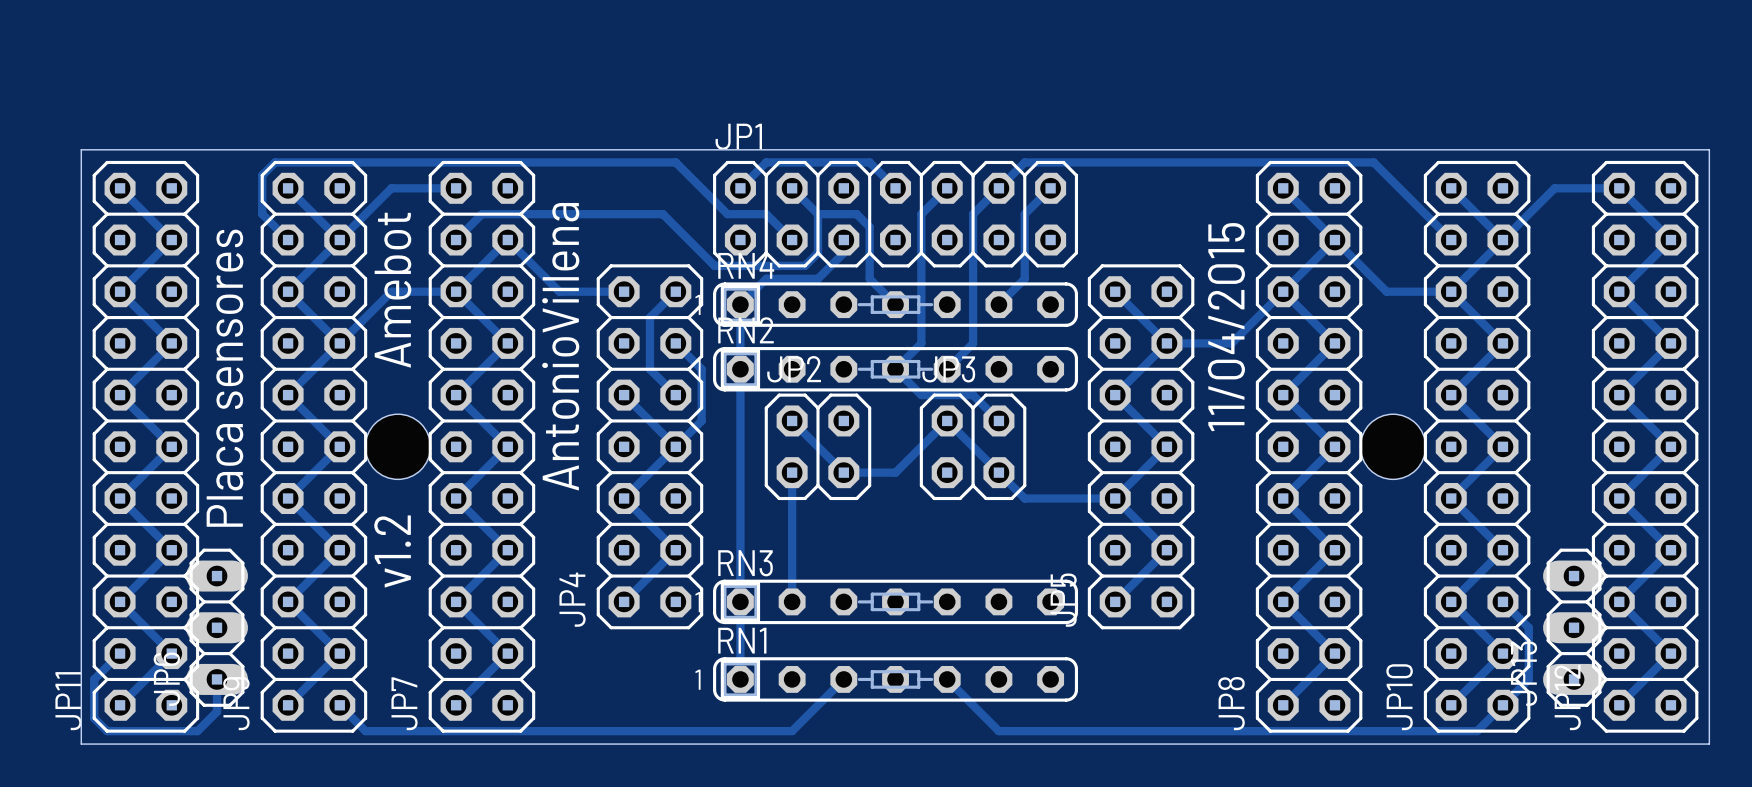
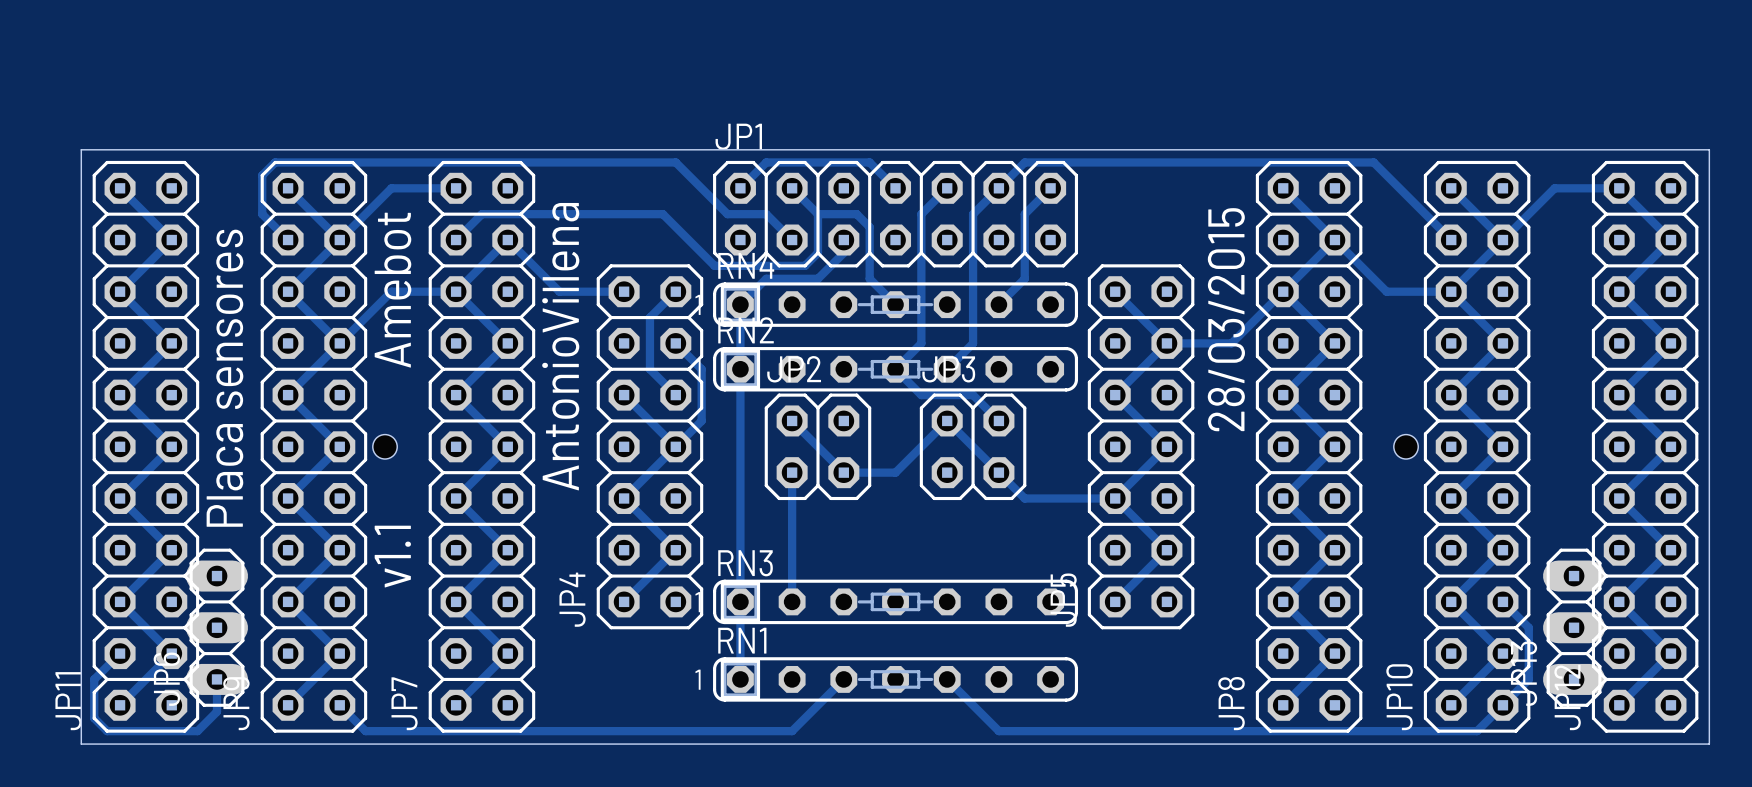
text: 11/04/2015 (1226, 327) -> 28/03/2015 (1226, 319)
hole size: [365, 414, 431, 480] -> [372, 434, 398, 460]
hole size: [1360, 414, 1426, 480] -> [1393, 434, 1419, 460]
text: v1.2 (392, 551) -> v1.1 (392, 556)

